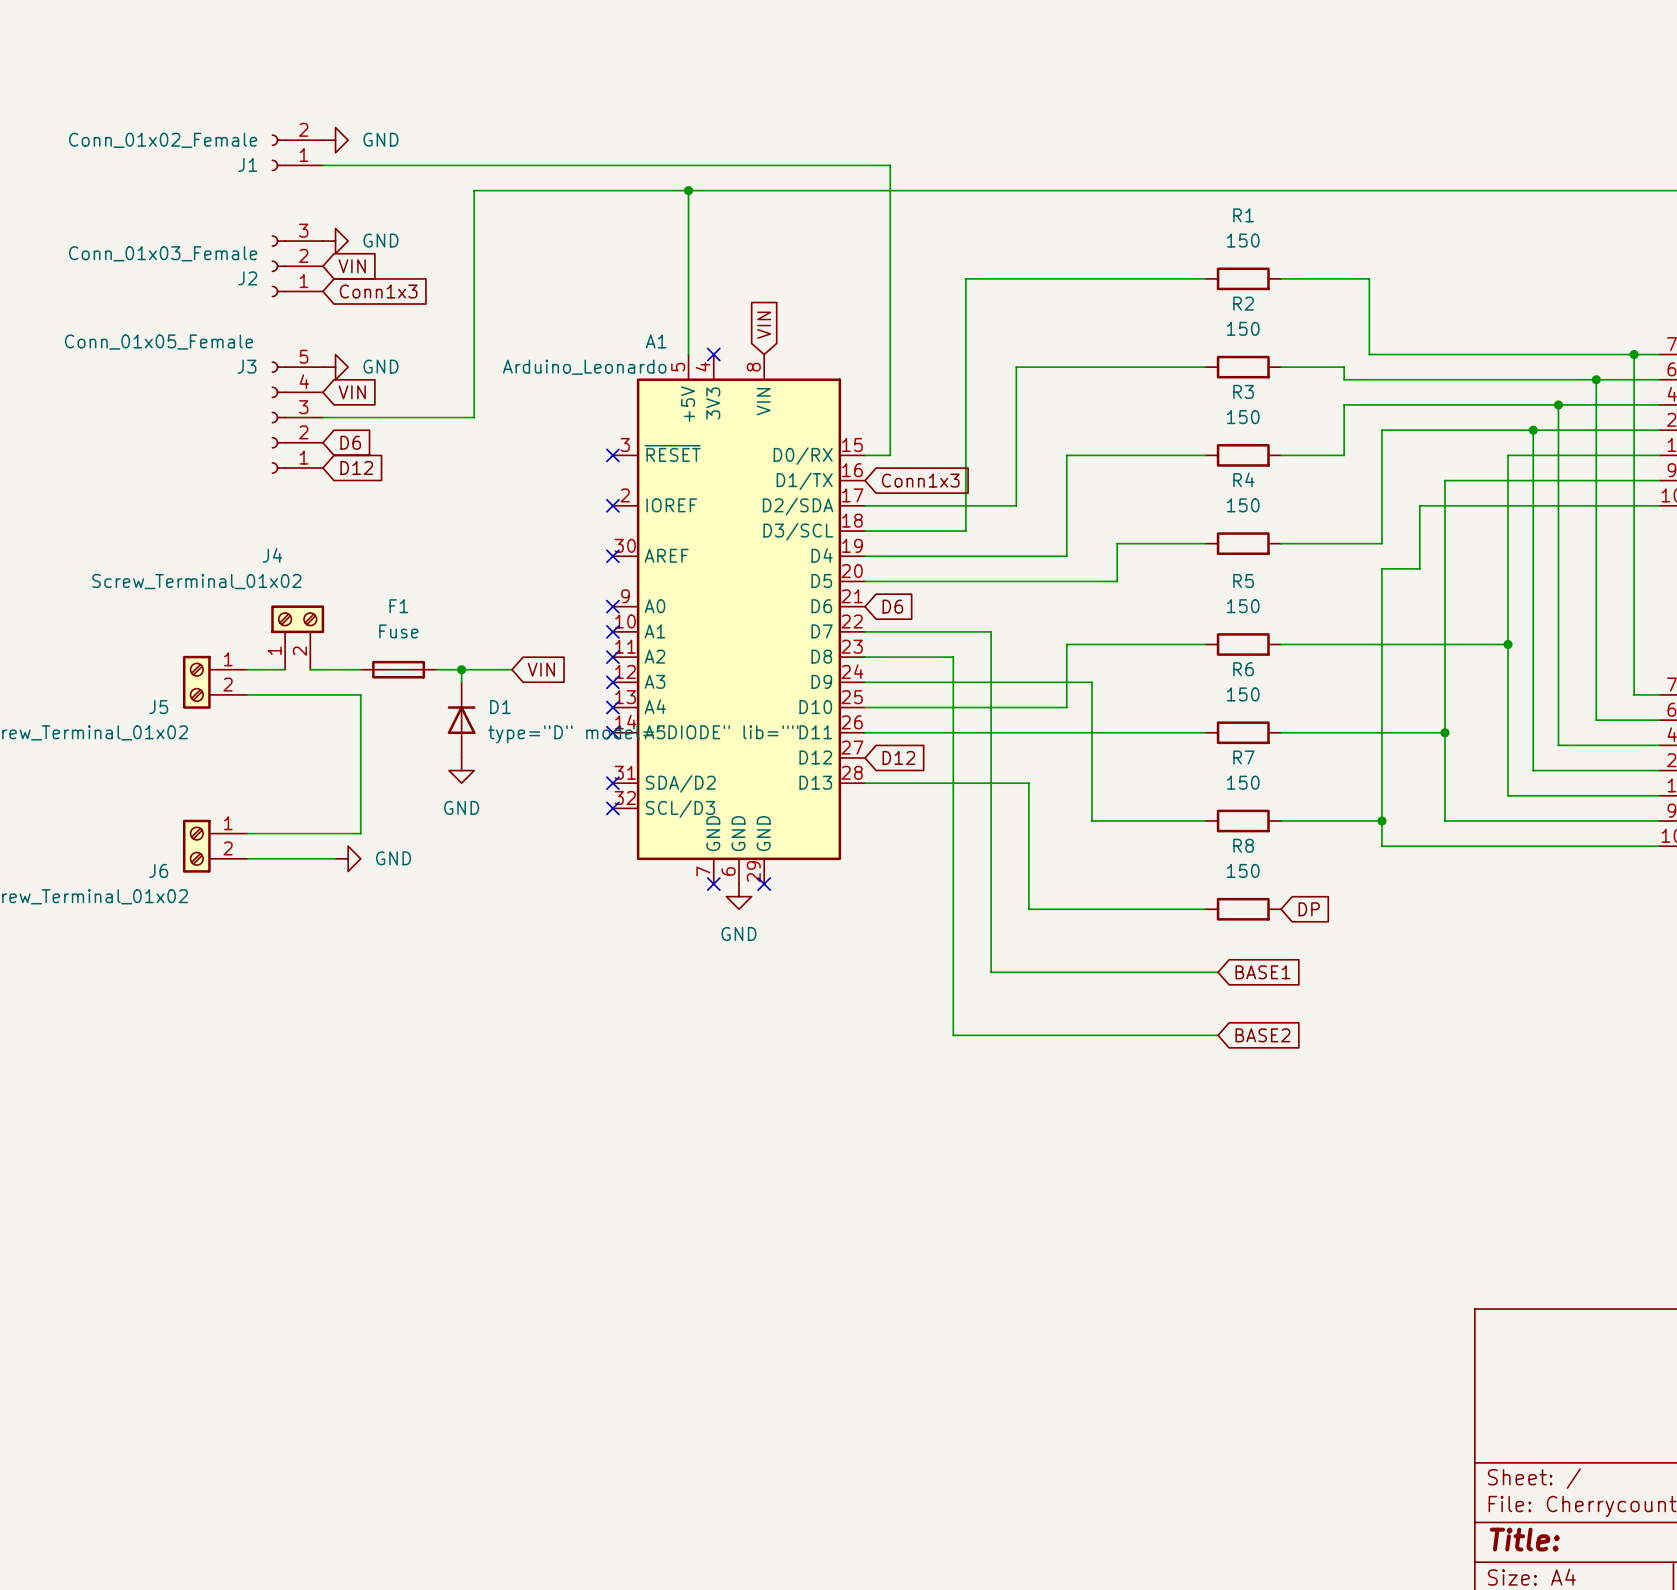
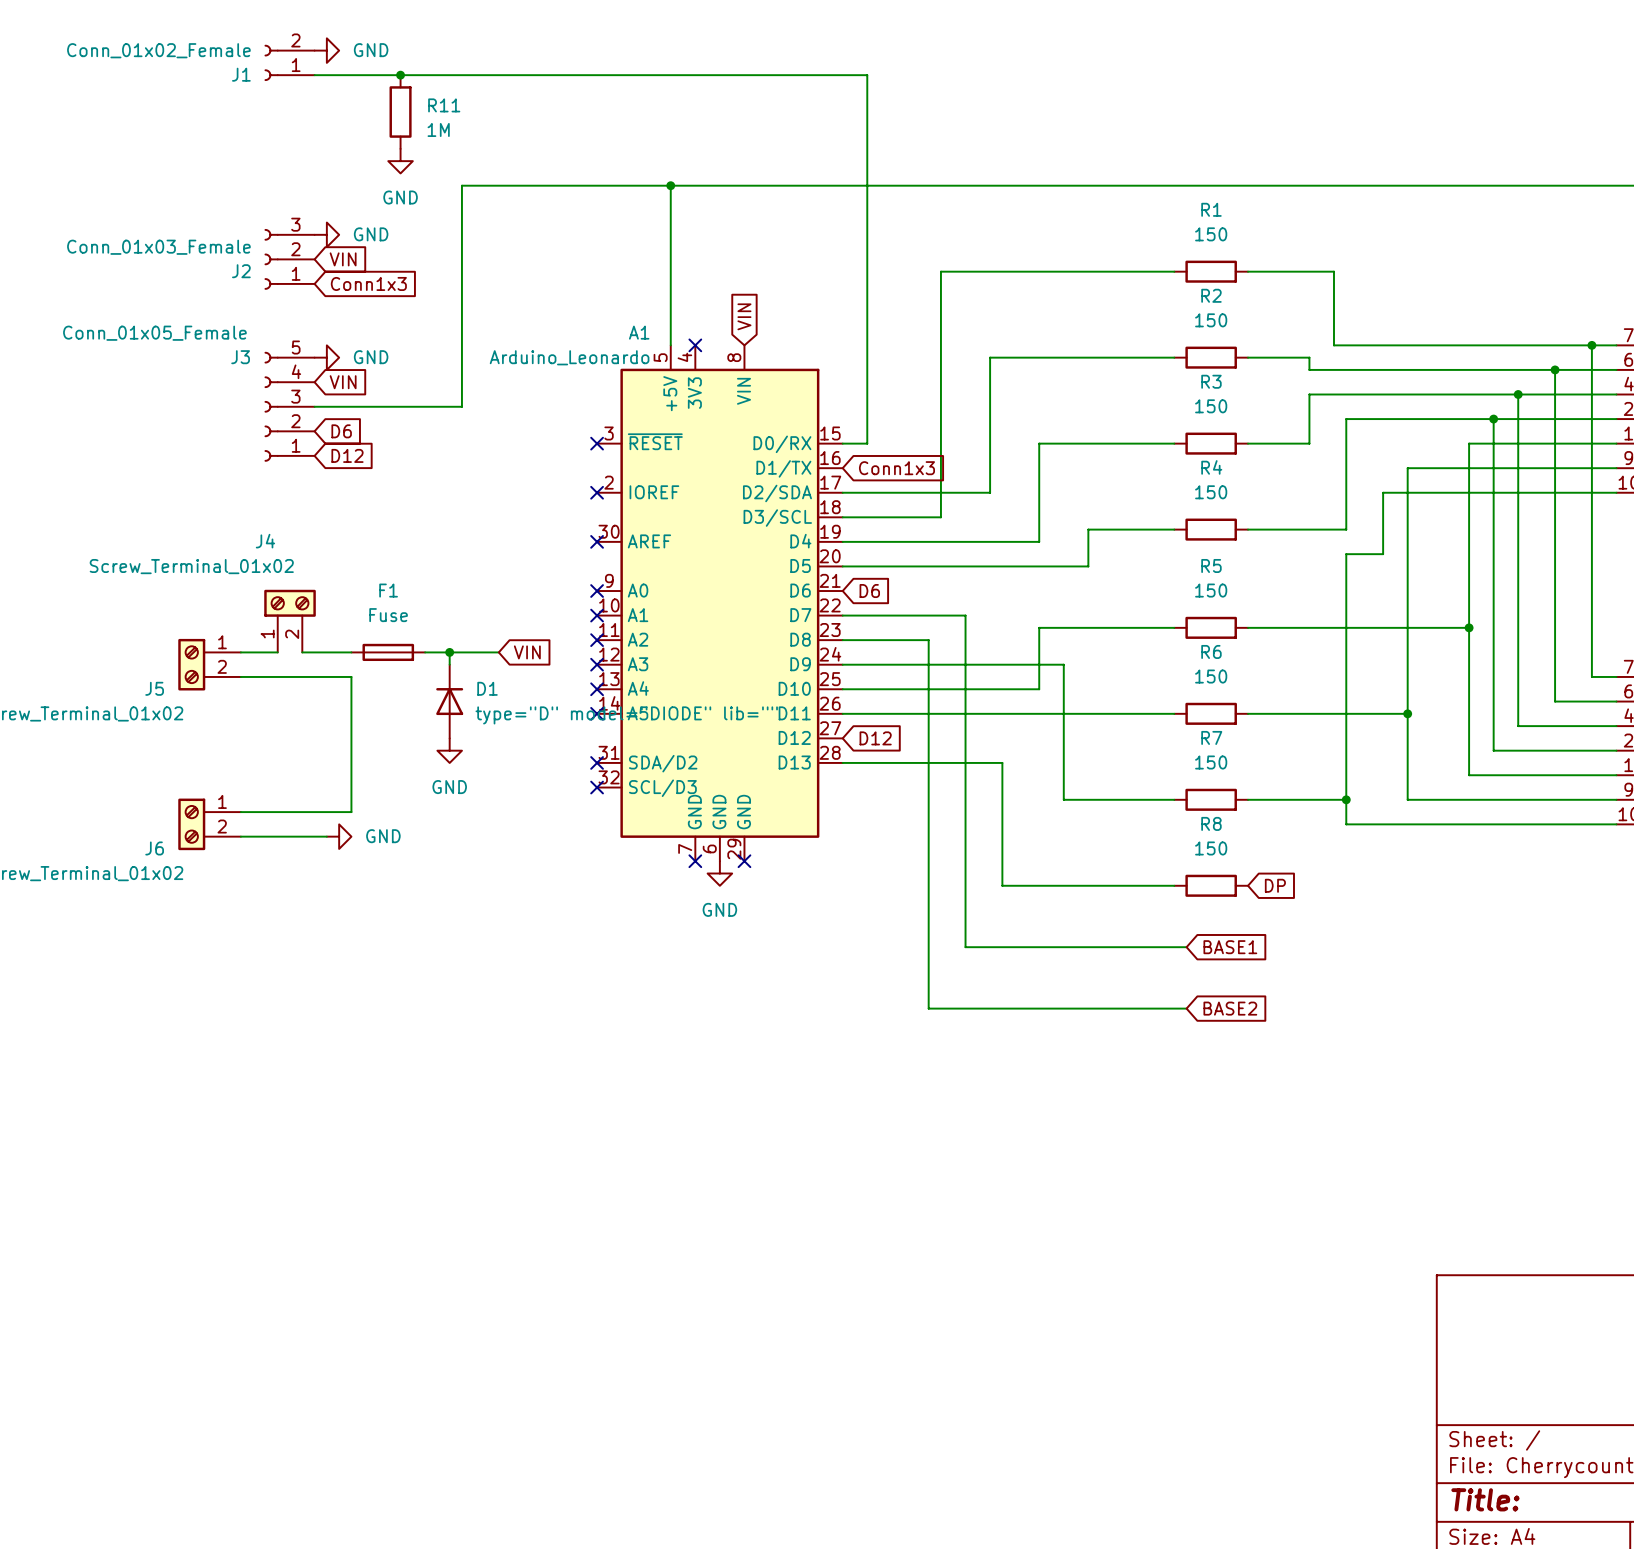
power symbol: none -> GND (326, 50)
junction: none -> (400, 75)
R11: none -> 1M (400, 112)
power symbol: GND (335, 140) -> none
J1 position: (297, 152) -> (289, 62)
wire: (322, 165) (890, 165) -> (314, 75) (867, 75) (867, 161)
power symbol: none -> GND (400, 161)

